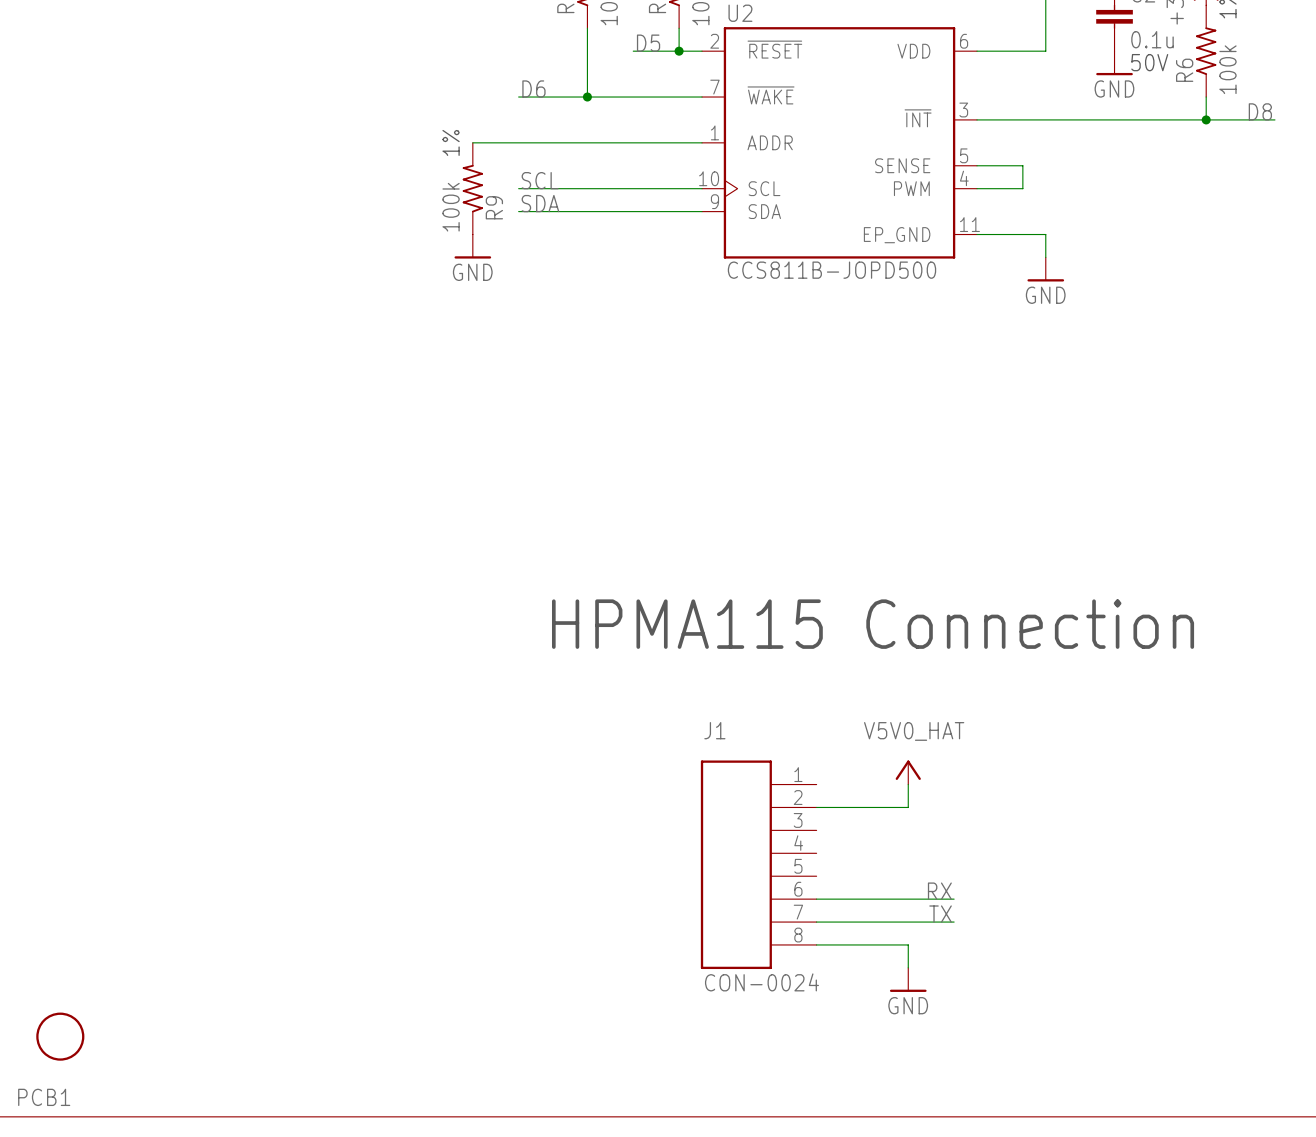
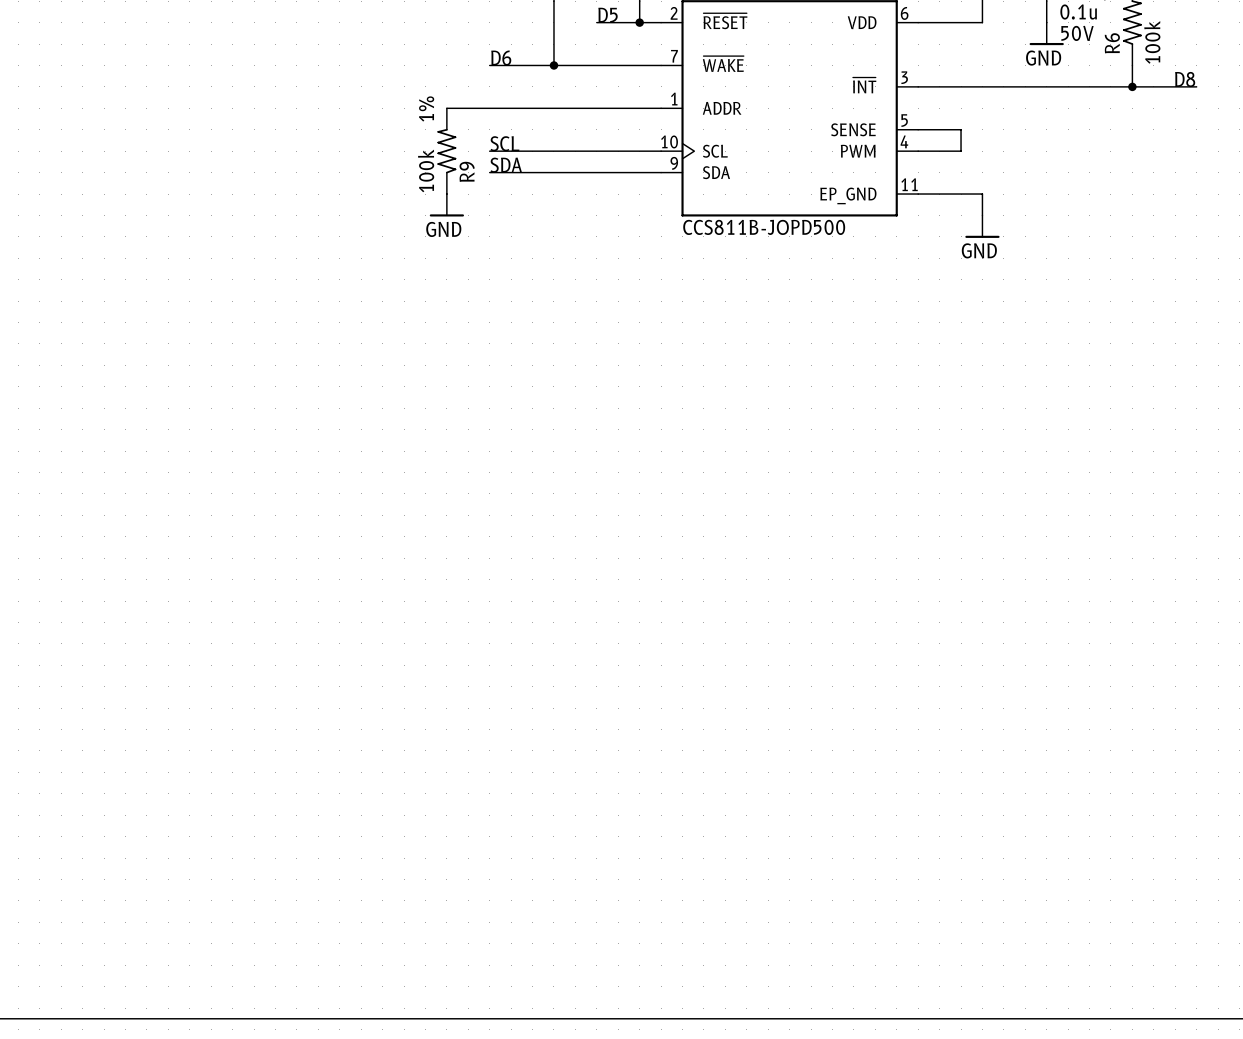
text: HPMA115 Connection (873, 624) -> none
power symbol: V5V0_HAT (908, 772) -> none
wire: (908, 784) (908, 807) (816, 807) -> none
J1: CON-0024 (758, 864) -> none
label: RX (939, 891) -> none
wire: (816, 899) (954, 899) -> none
label: TX (940, 914) -> none
wire: (816, 922) (954, 922) -> none
wire: (816, 944) (908, 944) (908, 967) -> none
power symbol: GND (908, 979) -> none
PCB1: (60, 1036) -> none

